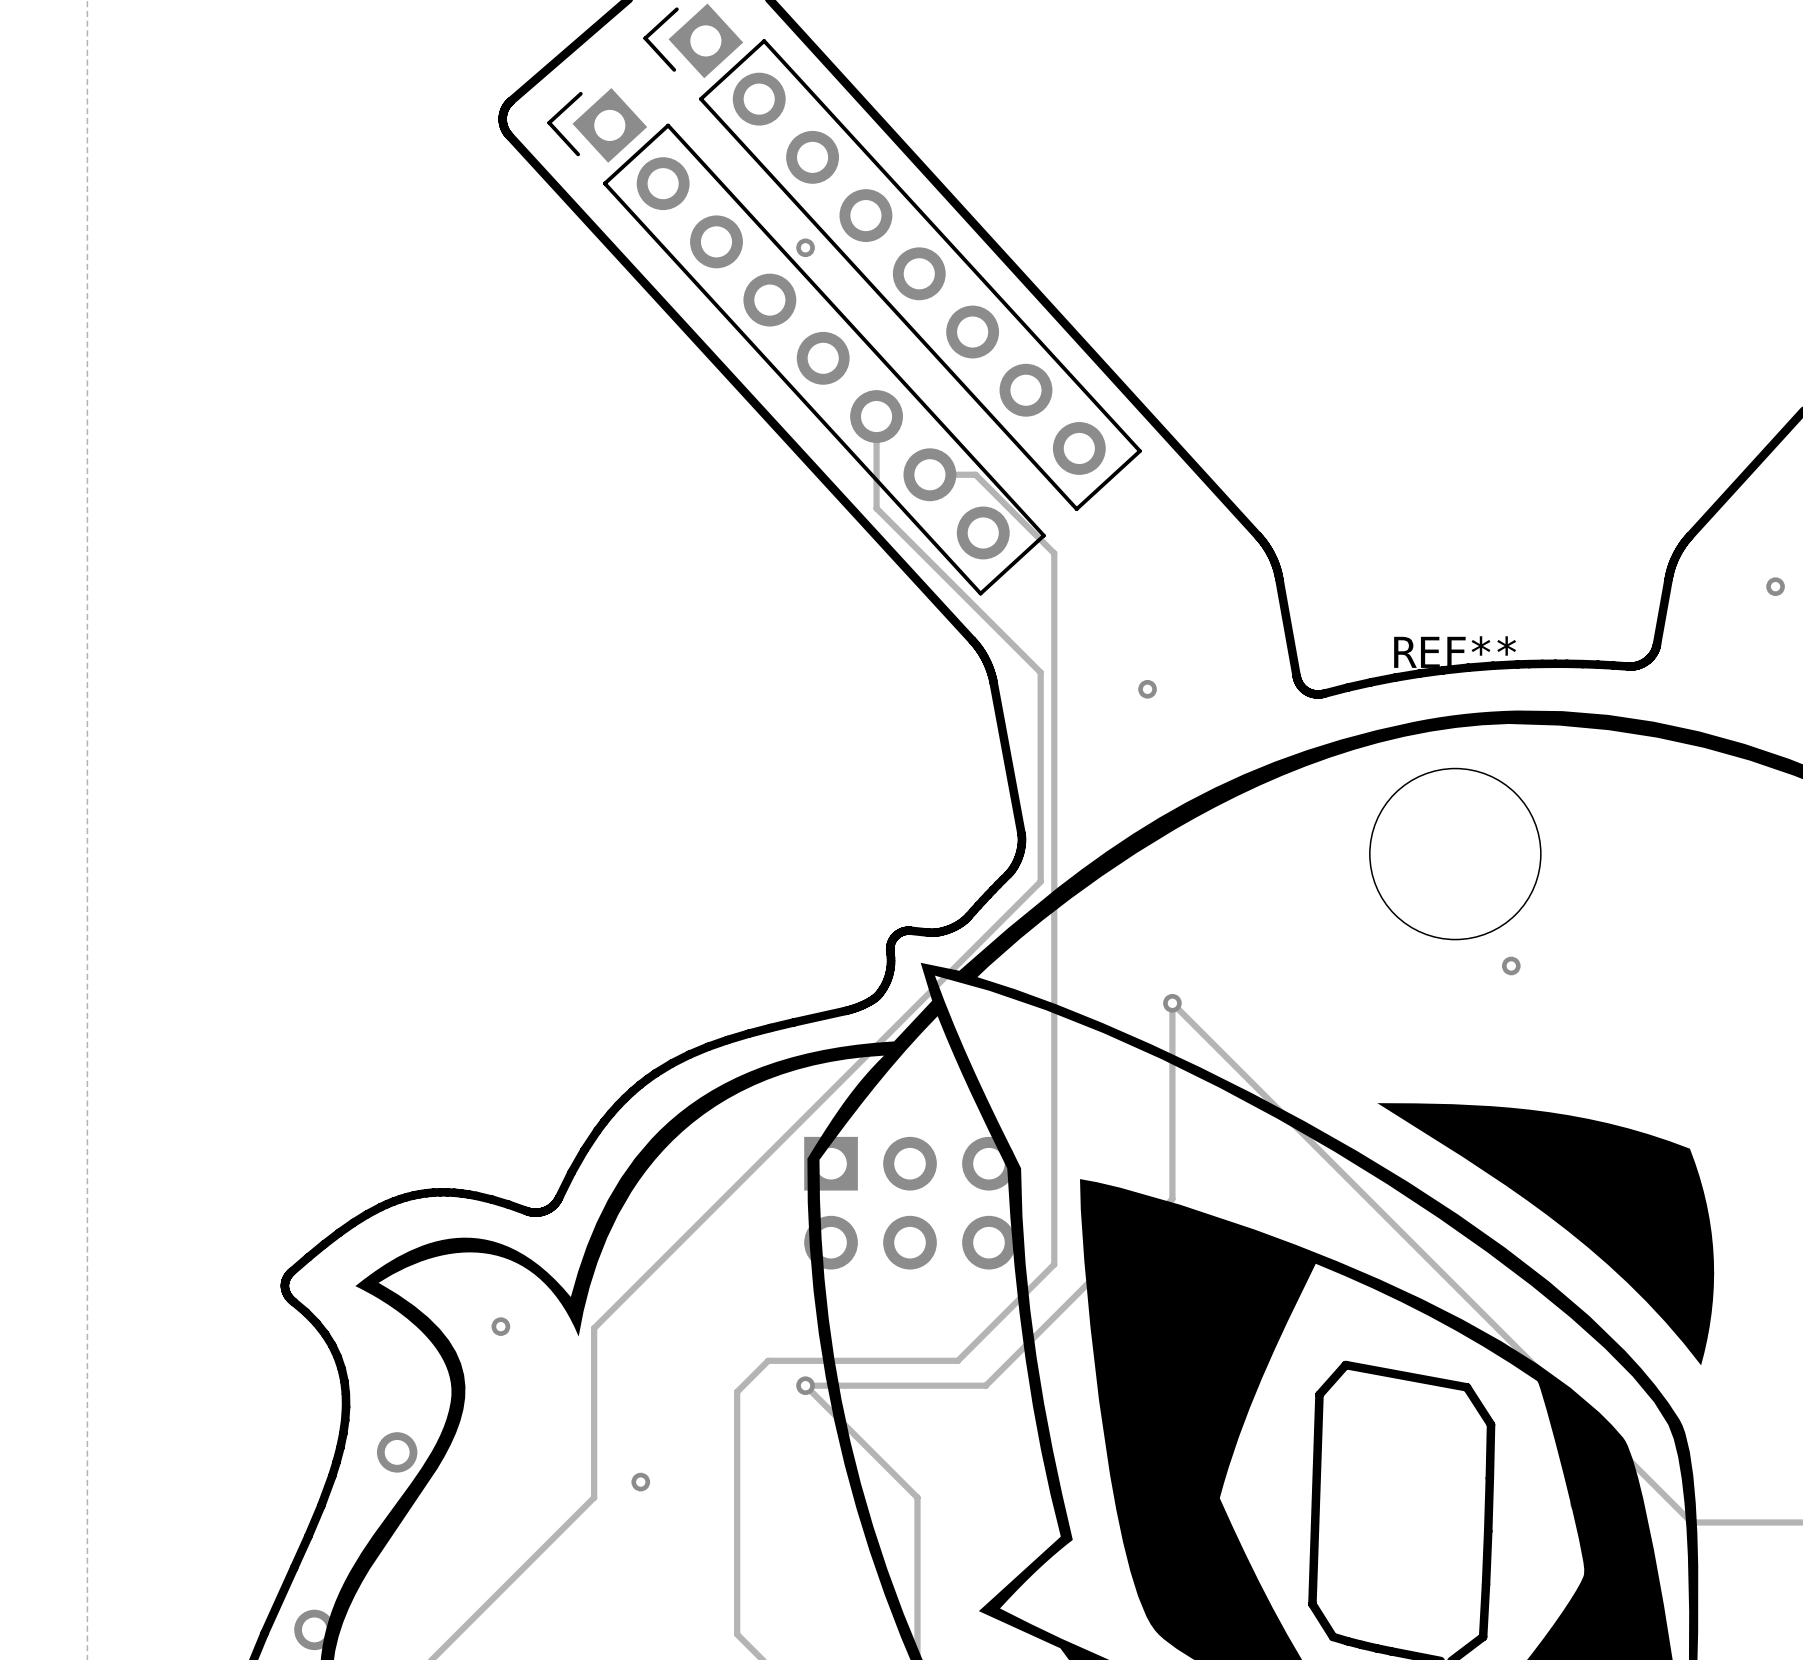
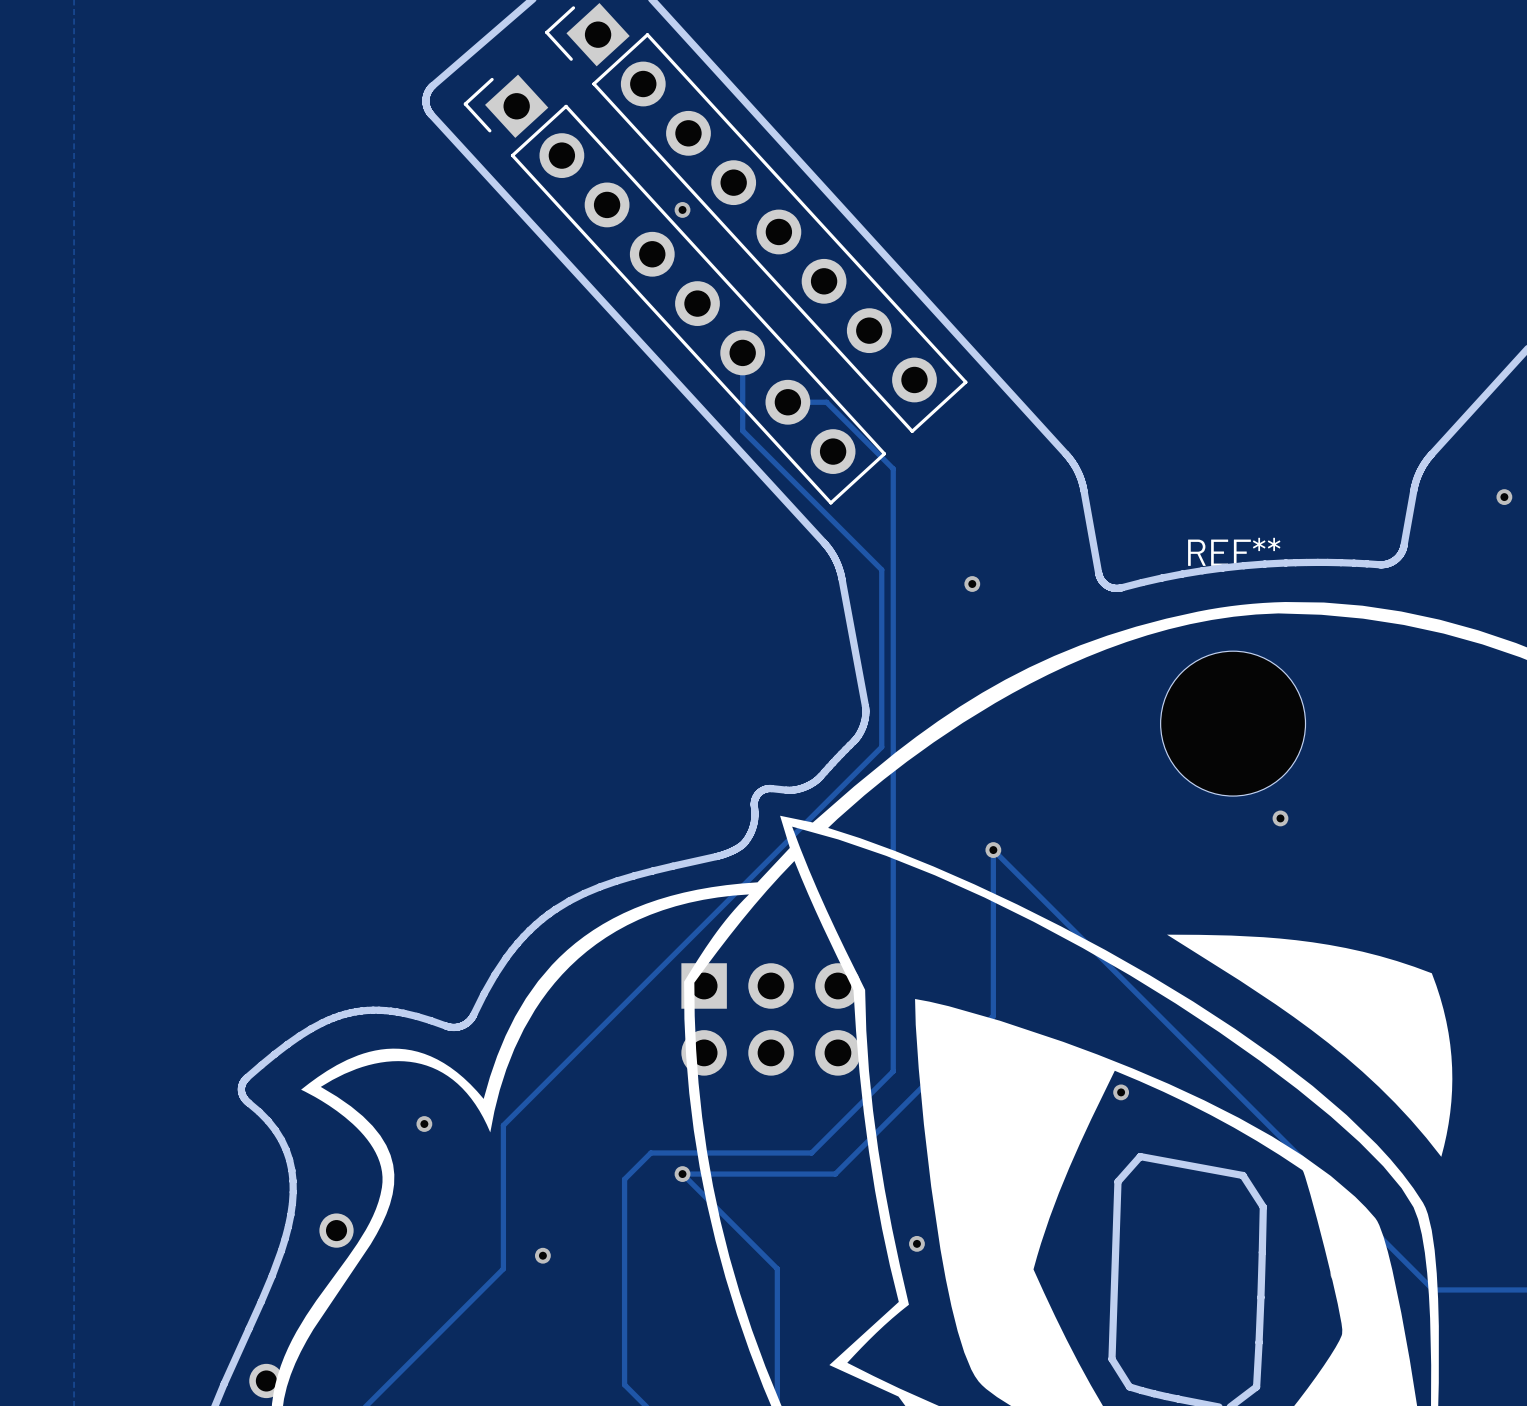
via: none -> (1121, 1092)
via: none -> (916, 1243)

